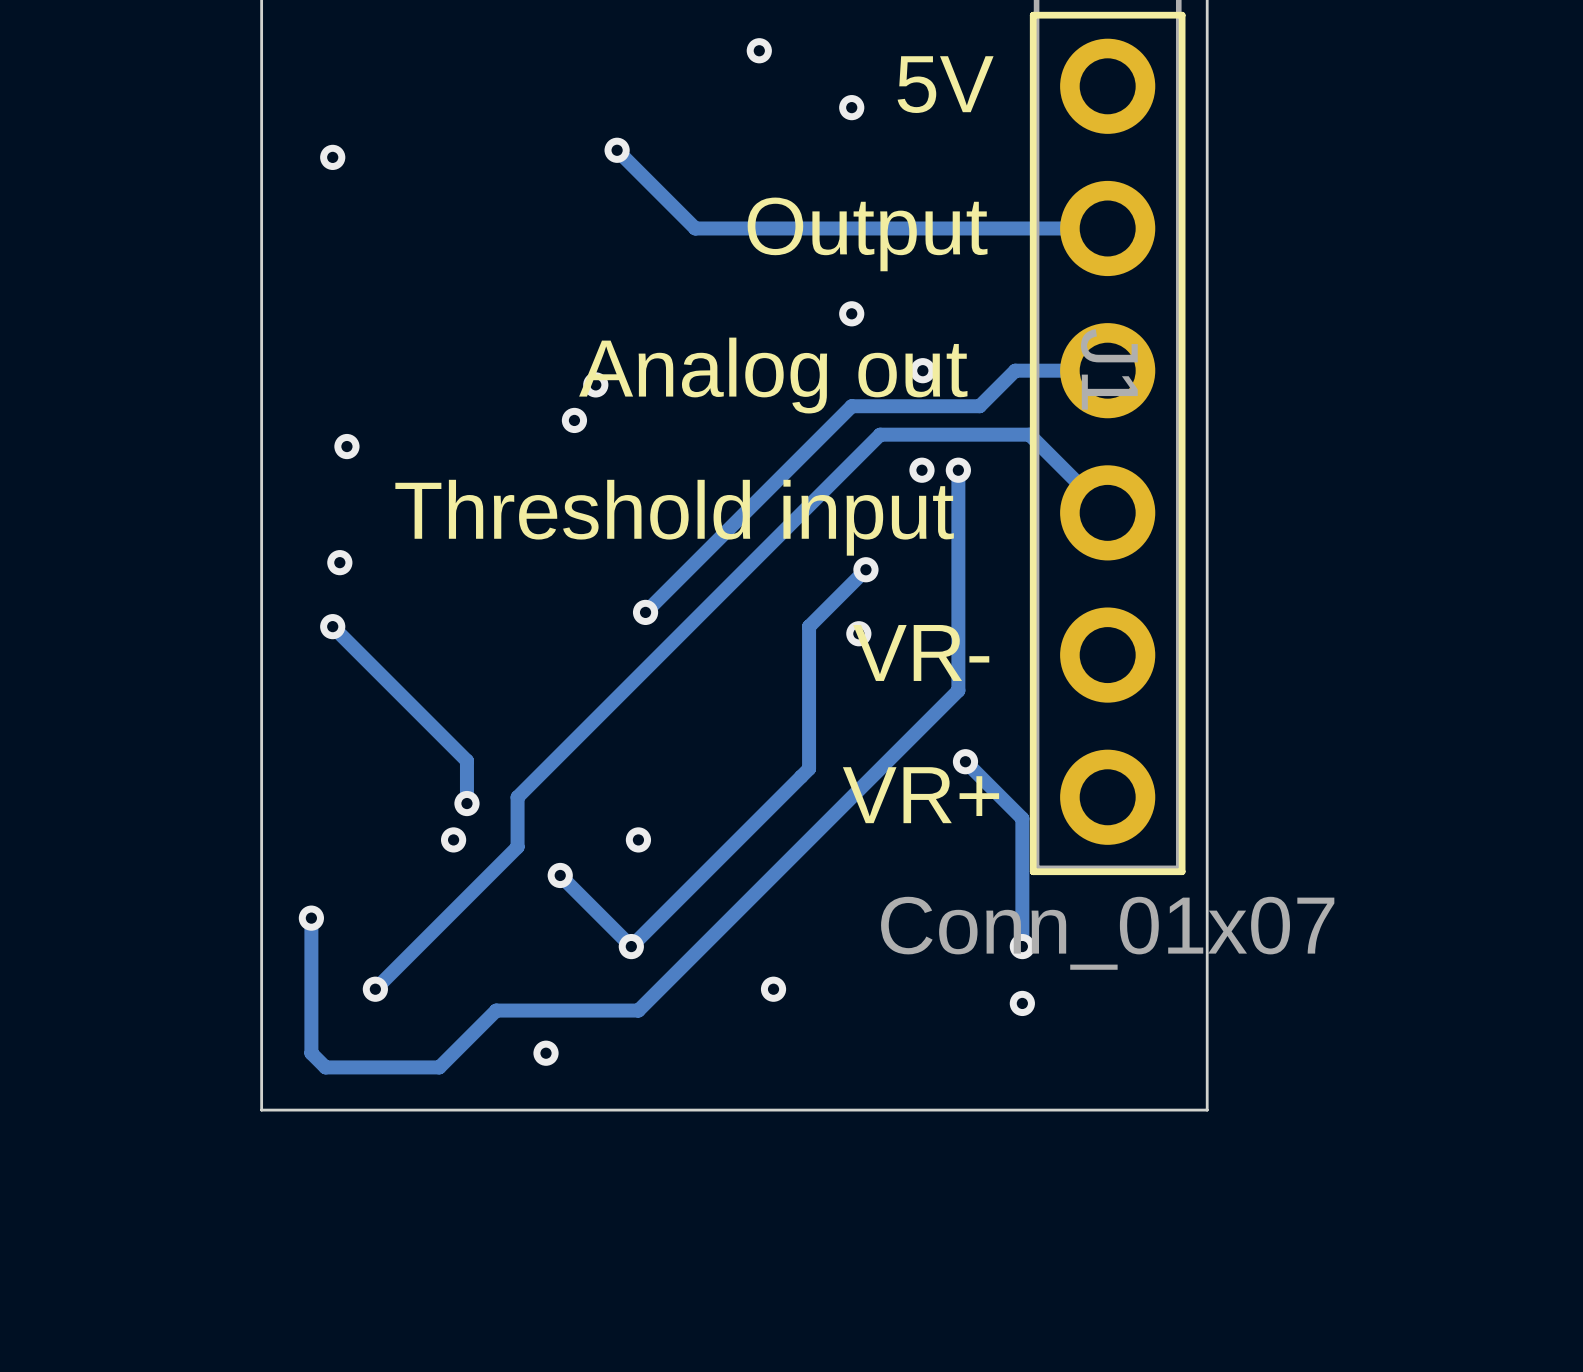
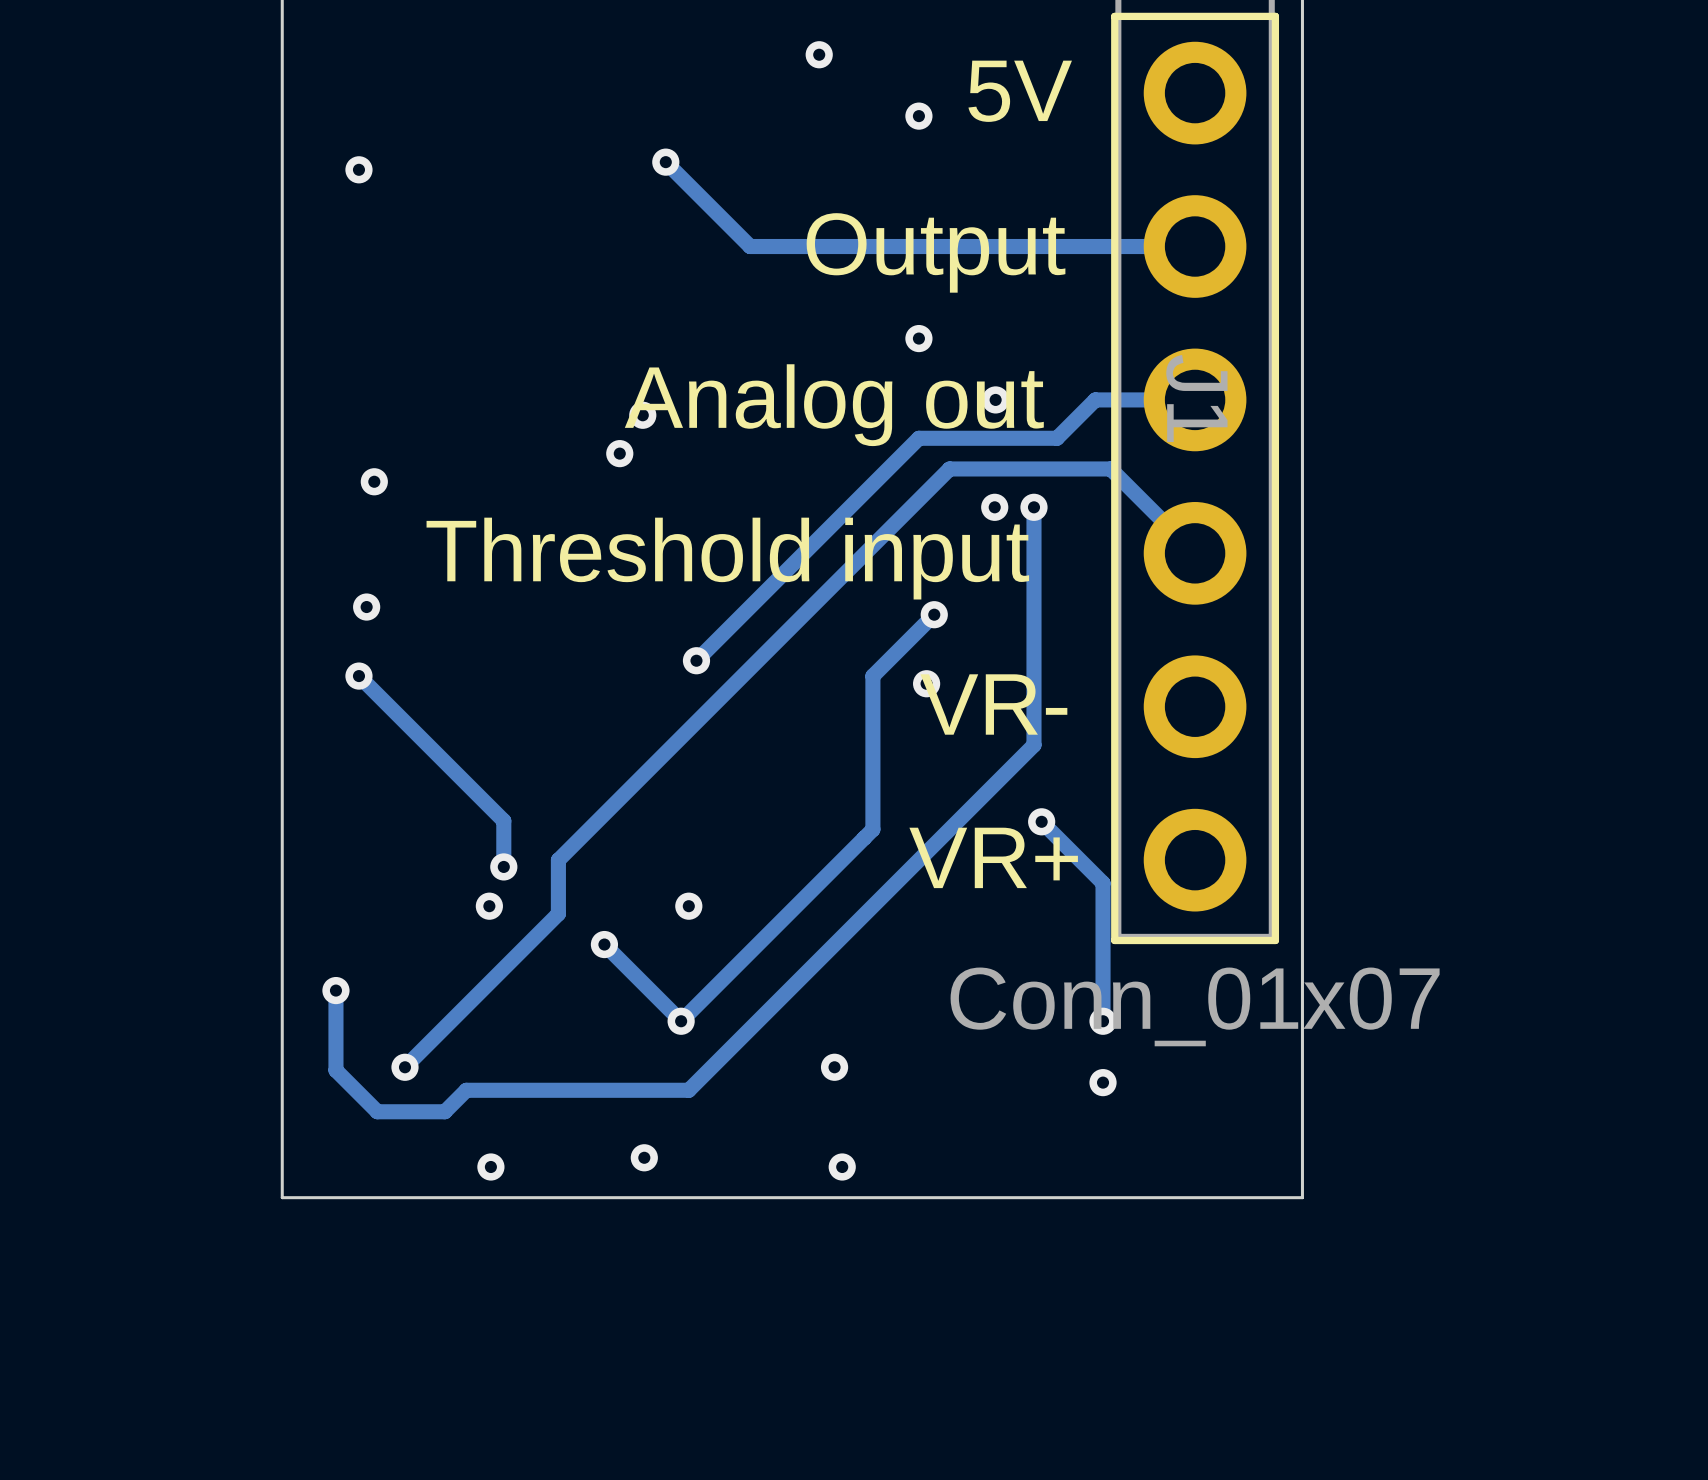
track: (311, 992) (311, 1053) (325, 1067) (439, 1067) (496, 1010) -> (335, 1070) (377, 1111) (444, 1111) (466, 1090) (535, 1090)
via: (546, 1053) -> none
via: none -> (644, 1157)
via: none -> (490, 1166)
via: none -> (842, 1166)

